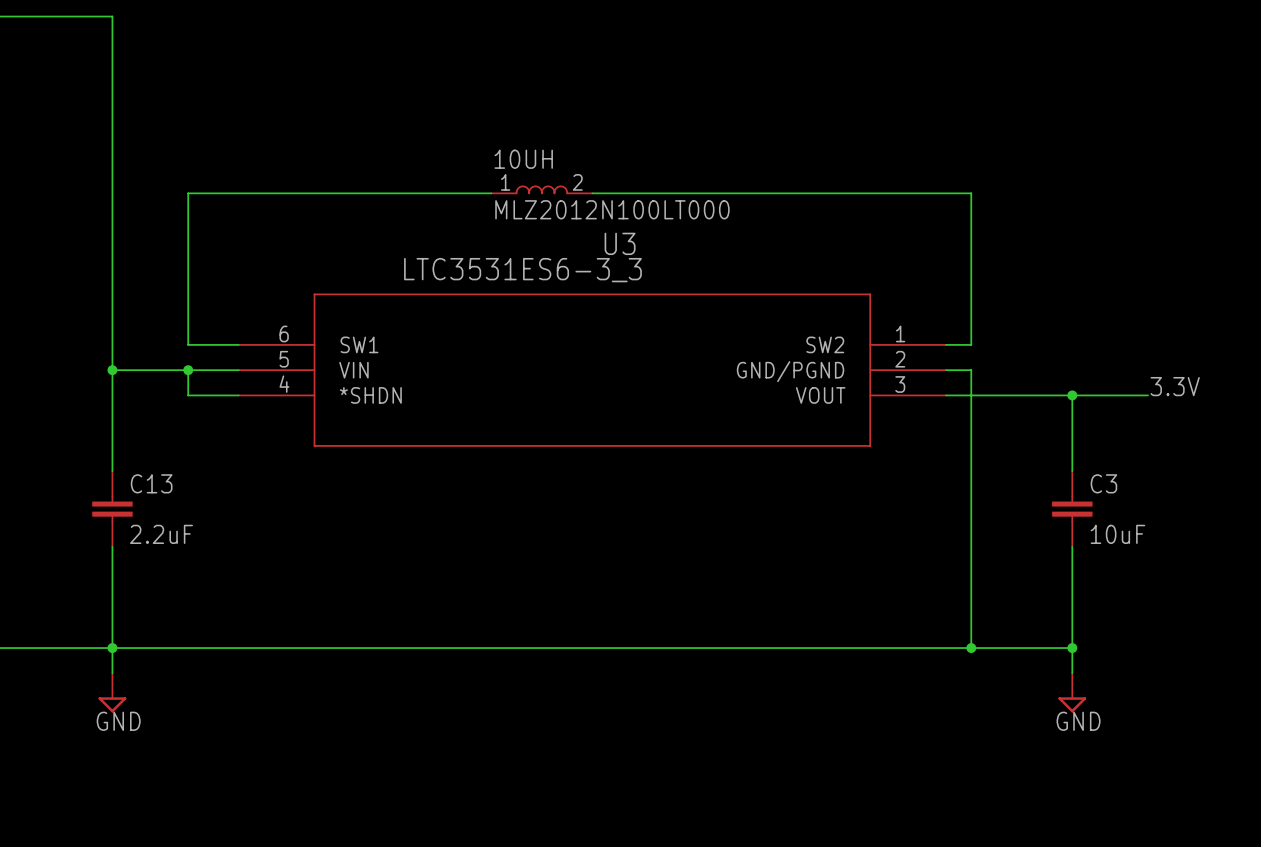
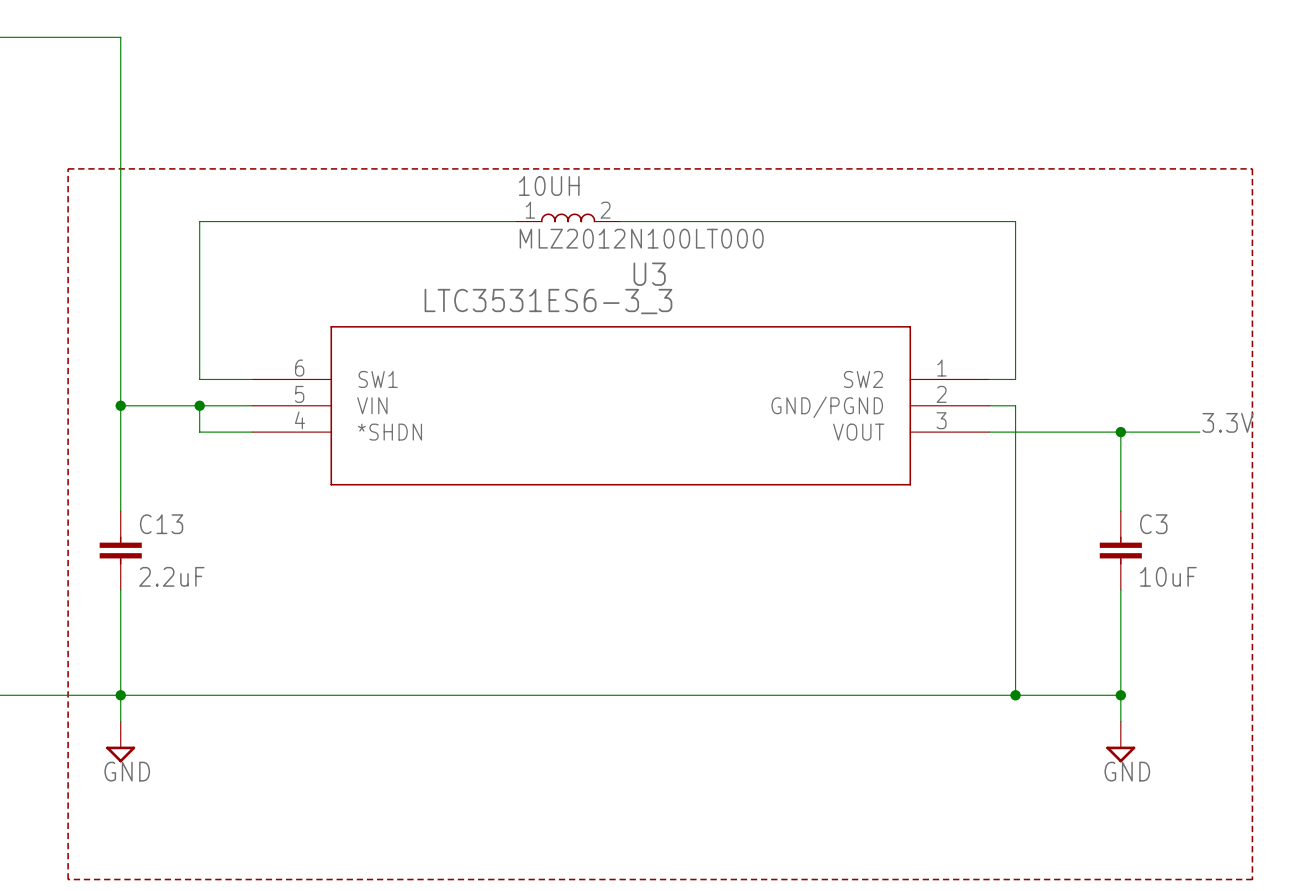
line: none -> (68, 168) (1252, 168) (1252, 879) (68, 879) (68, 168)

